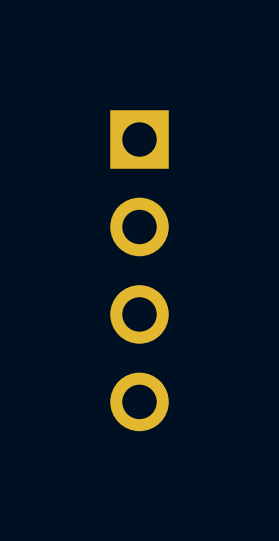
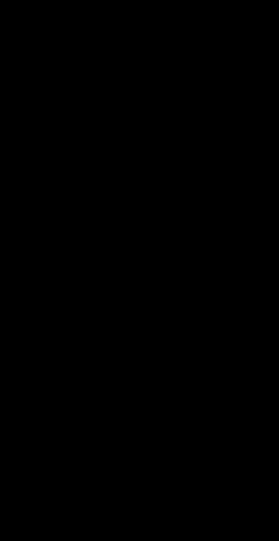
part: (139, 270) -> none

